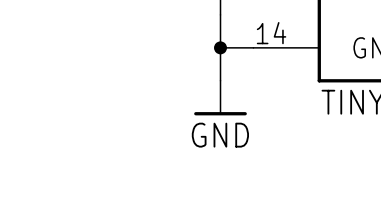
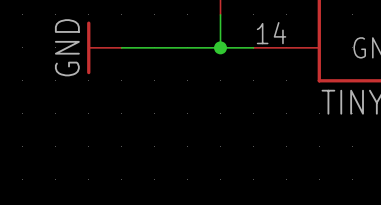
wire: (220, 47) (220, 80) -> (220, 47) (121, 47)
power symbol position: GND (220, 98) -> GND (104, 47)
power symbol rotation: 0° (220, 113) -> 90° clockwise (88, 47)

